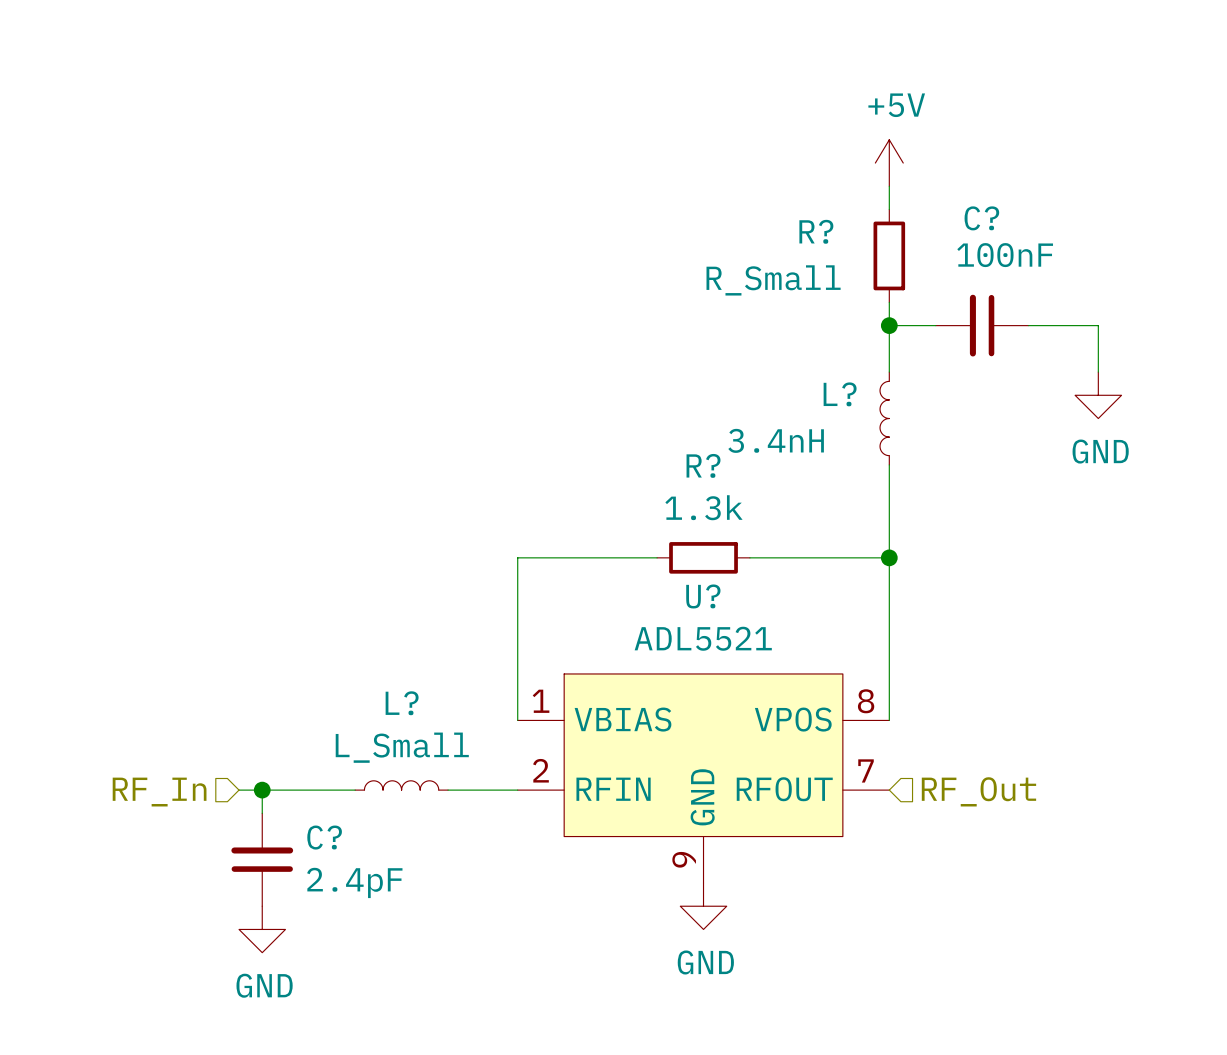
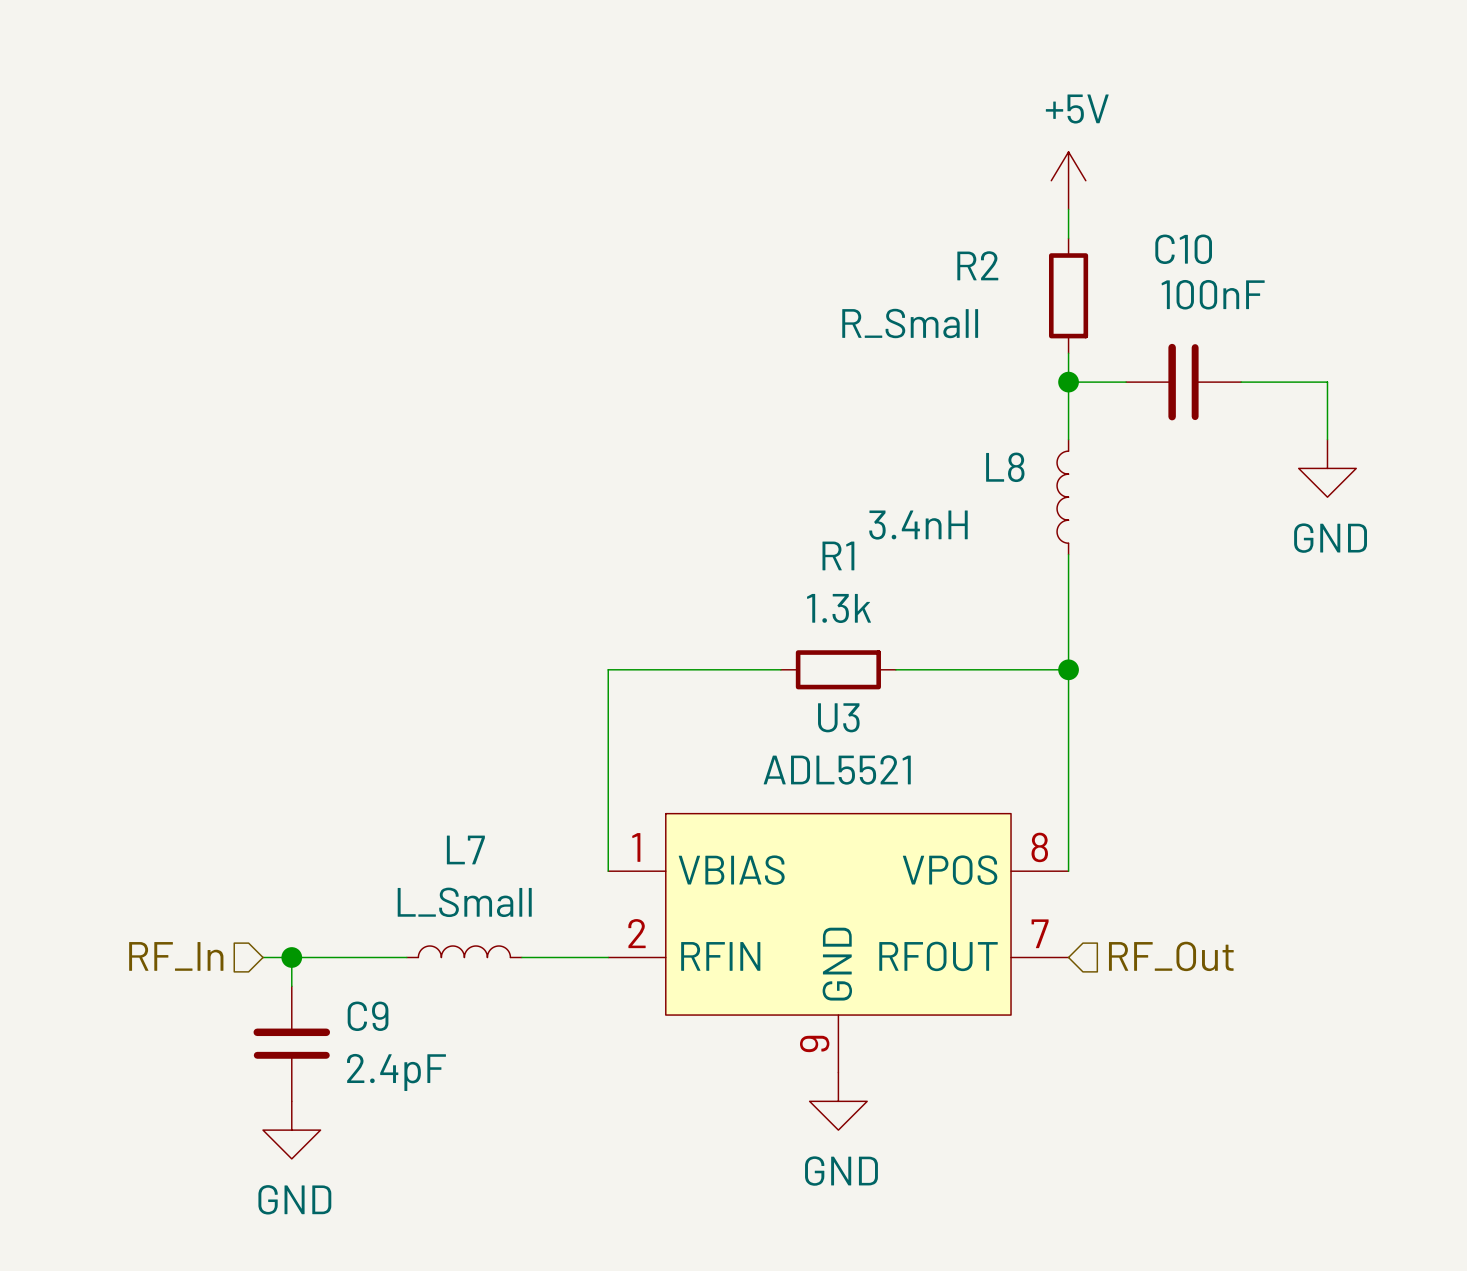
C? name: C? (981, 218) -> C10 (1183, 249)
R? name: R? (816, 231) -> R2 (977, 265)
L? name: L? (840, 394) -> L8 (1005, 467)
R? name: R? (703, 465) -> R1 (838, 555)
U? name: U? (703, 596) -> U3 (838, 717)
L? name: L? (402, 703) -> L7 (465, 849)
C? name: C? (324, 837) -> C9 (368, 1016)

